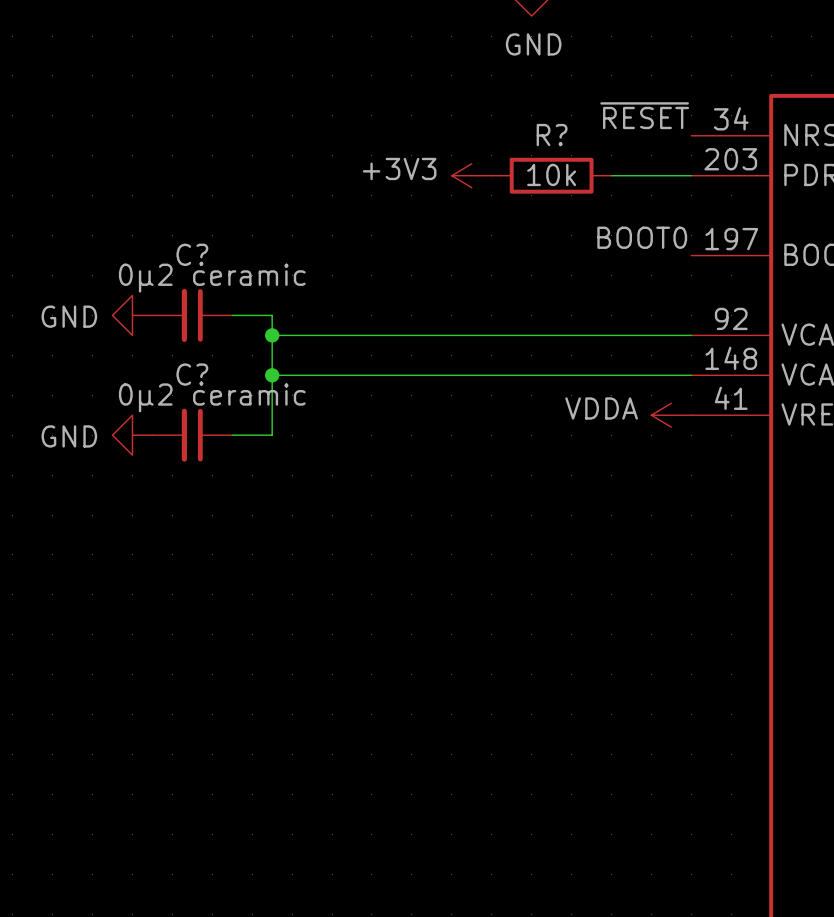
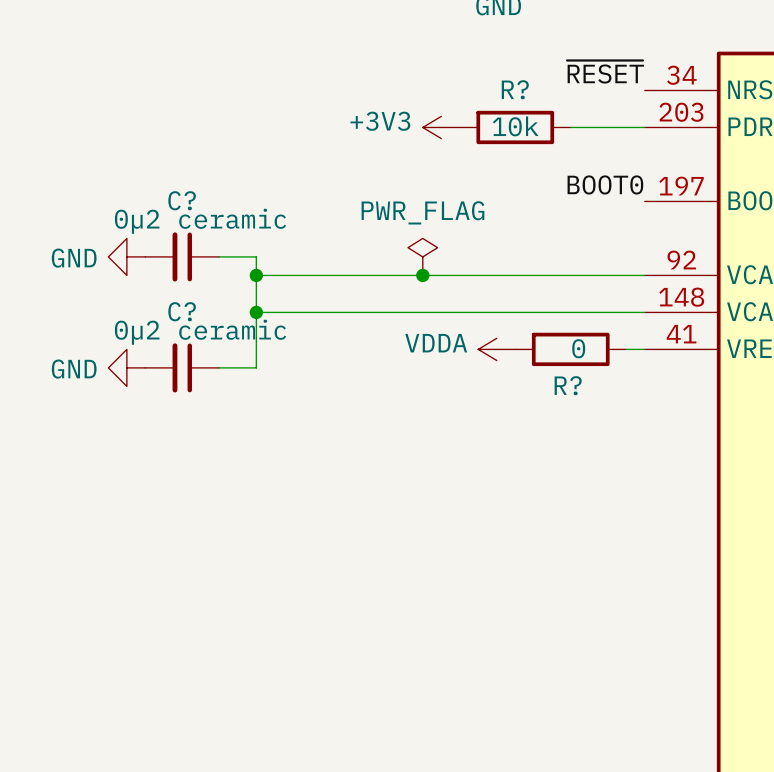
power symbol: none -> PWR_FLAG (422, 256)
junction: none -> (422, 275)
R?: none -> 0 (570, 349)
power symbol position: VDDA (671, 415) -> VDDA (496, 349)

